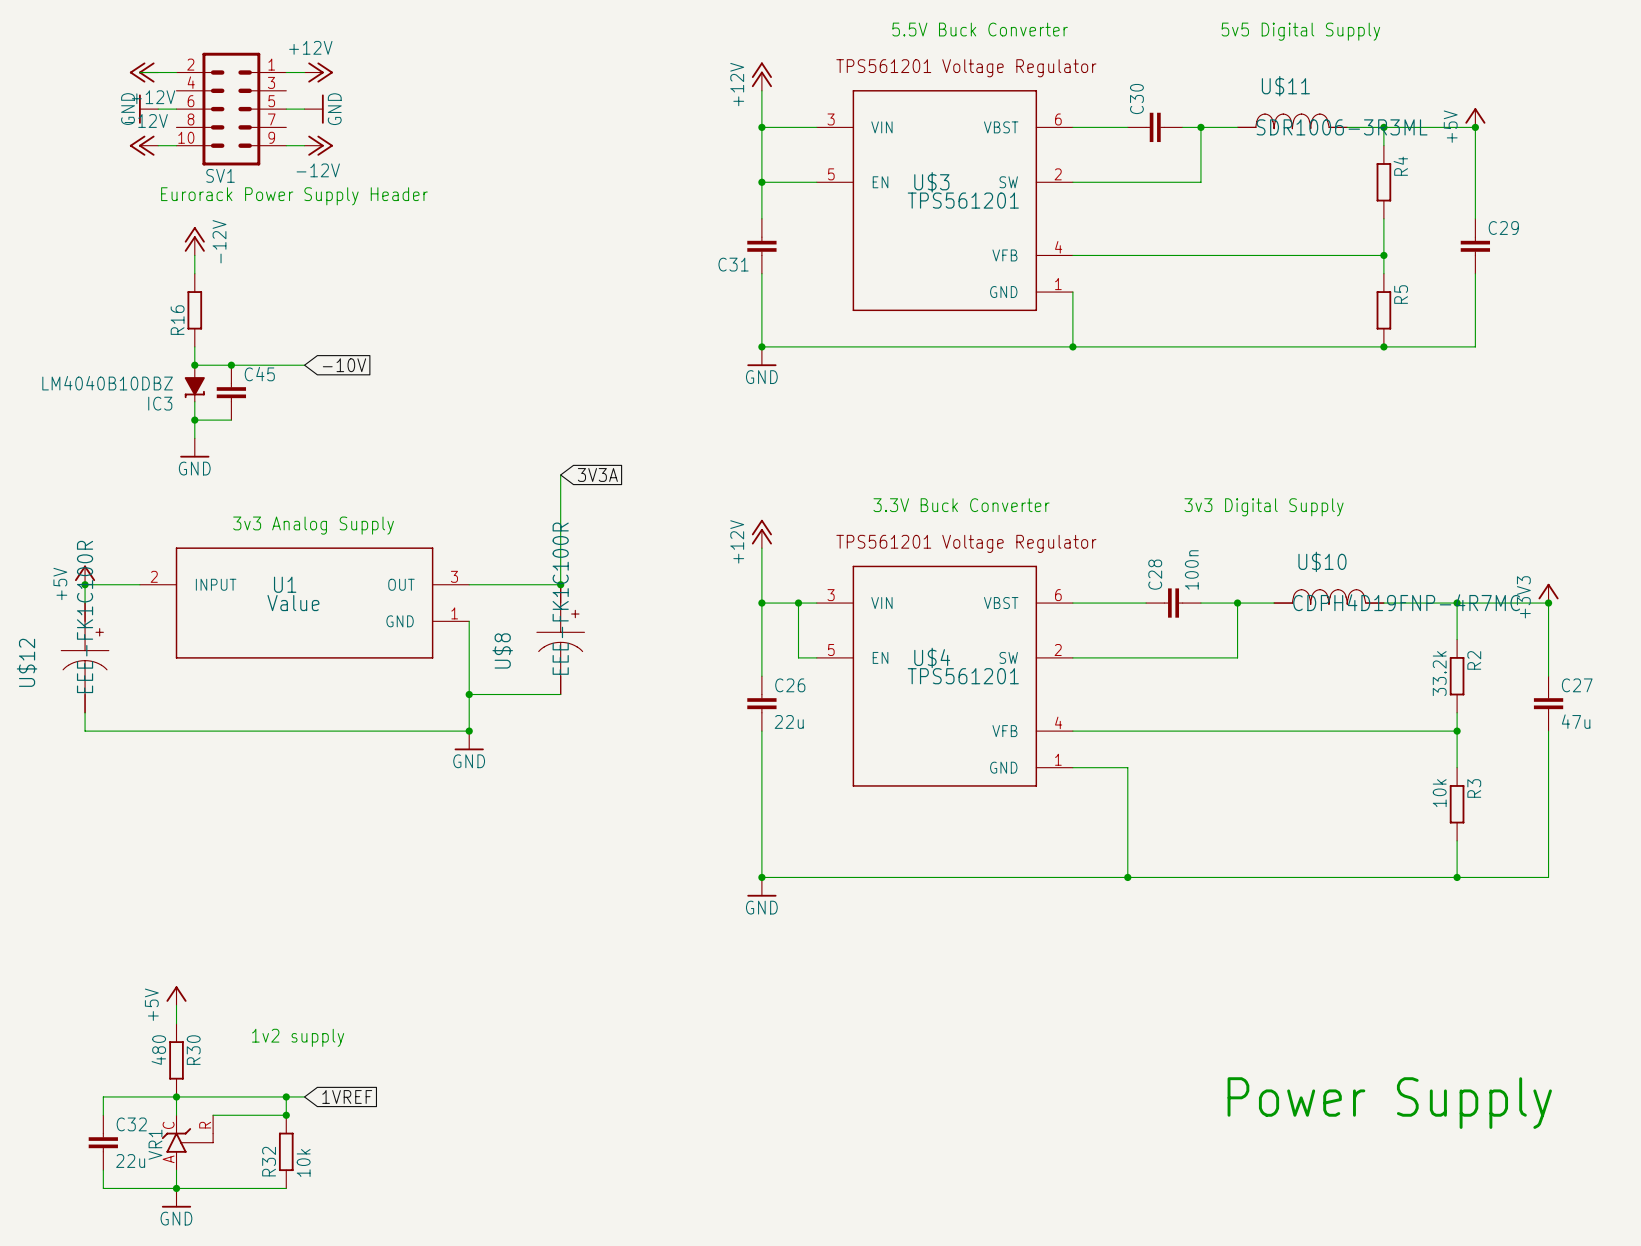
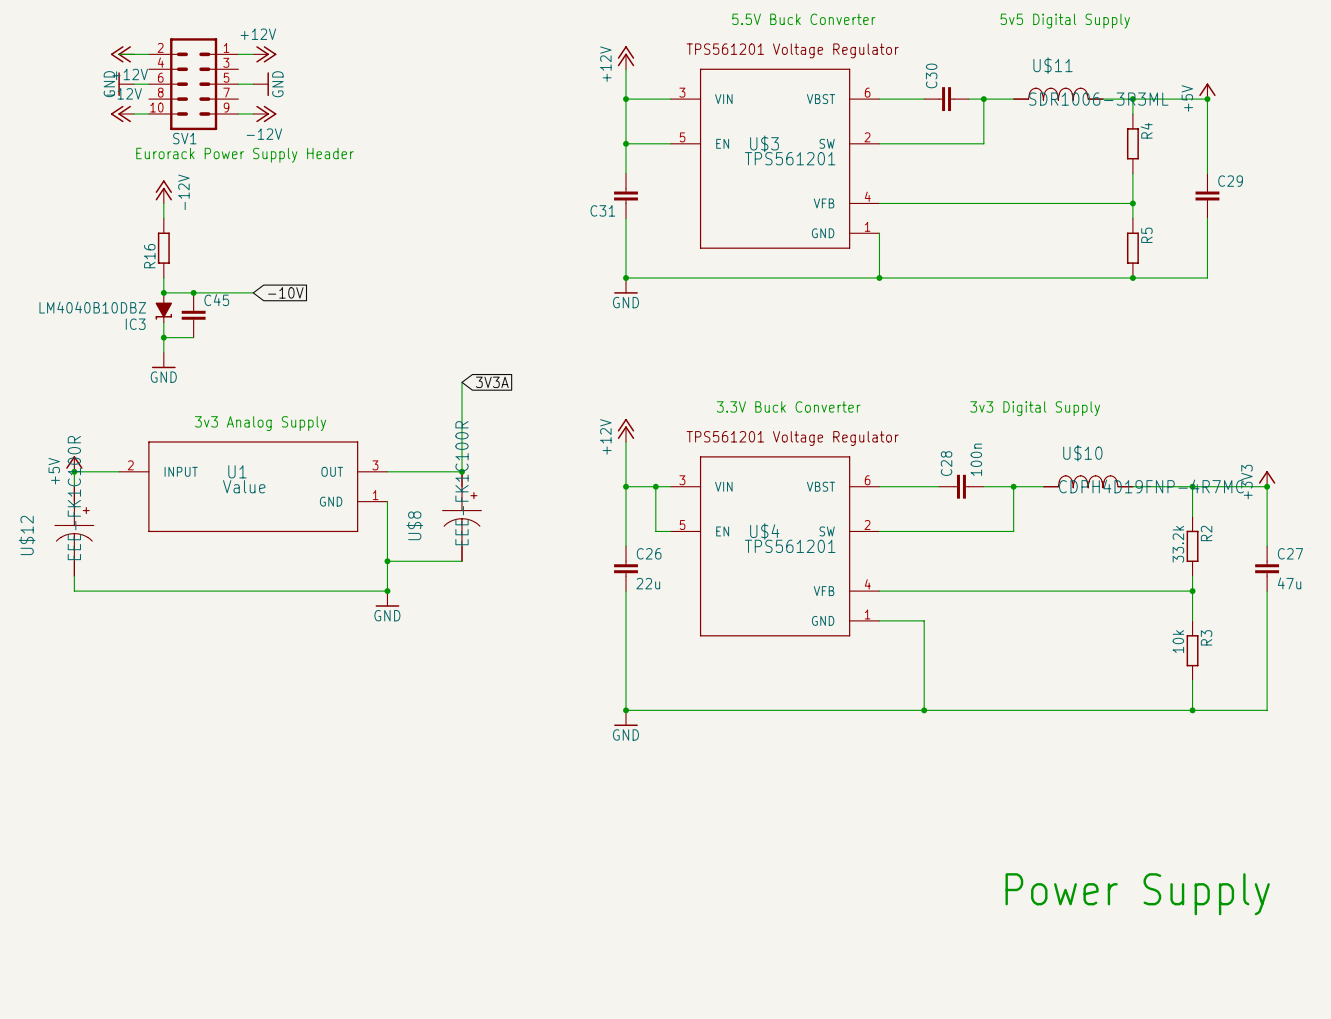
power symbol: +5V (176, 995) -> none
wire: (176, 1005) (176, 1023) -> none
text: 1v2 supply (298, 1037) -> none
R30: 480 (176, 1060) -> none
wire: (176, 1096) (176, 1115) -> none
junction: (176, 1096) -> none
wire: (286, 1096) (286, 1115) (213, 1115) -> none
junction: (286, 1096) -> none
wire: (304, 1096) (103, 1096) (103, 1115) -> none
global label: 1VREF (347, 1096) -> none
junction: (286, 1115) -> none
C32: 22u (103, 1142) -> none
VR1: (187, 1142) -> none
R32: 10k (286, 1151) -> none
wire: (103, 1170) (103, 1188) (286, 1188) -> none
wire: (176, 1170) (176, 1188) -> none
junction: (176, 1188) -> none
power symbol: GND (176, 1198) -> none

